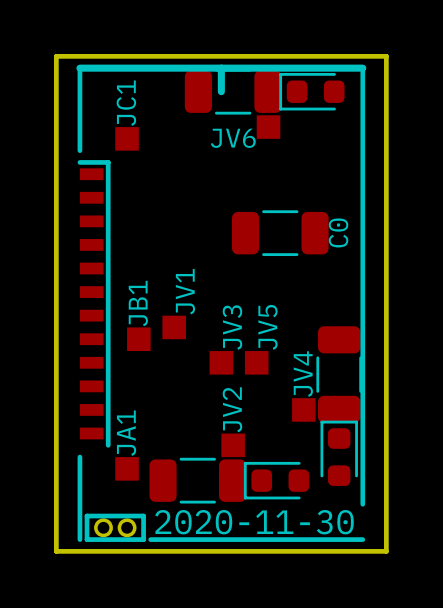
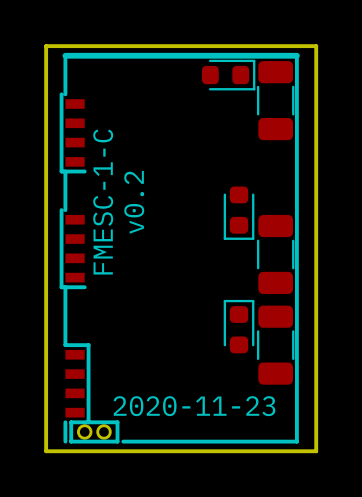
line: (221, 68) (221, 91) -> none
part rotation: 0° (233, 91) -> 90° clockwise (275, 100)
part position: (233, 91) -> (275, 100)
part rotation: 0° (311, 91) -> 180° (228, 75)
line: (79, 115) (79, 150) -> (296, 412) (296, 441)
JV6: (268, 127) -> none
JC1: (127, 138) -> none
part footprint: [77, 160, 111, 448] -> [59, 208, 87, 290]
part: none -> (73, 132)
line: none -> (65, 171) (65, 210)
C0: (280, 233) -> none
text: none -> FMESC-1-C (103, 202)
text: none -> v0.2 (134, 202)
part: none -> (239, 213)
part: none -> (275, 254)
JV1: (174, 327) -> none
JB1: (138, 339) -> none
line: none -> (65, 287) (65, 345)
JV3: (221, 362) -> none
JV5: (256, 362) -> none
part: (339, 374) -> none
part: none -> (239, 326)
JV4: (303, 409) -> none
part: none -> (275, 345)
JV2: (233, 445) -> none
part: (339, 453) -> none
line: (79, 457) (79, 516) -> none
part: none -> (76, 383)
JA1: (127, 468) -> none
part: (197, 480) -> none
part: (276, 480) -> none
text: 2020-11-30 (254, 522) -> 2020-11-23 (194, 406)

